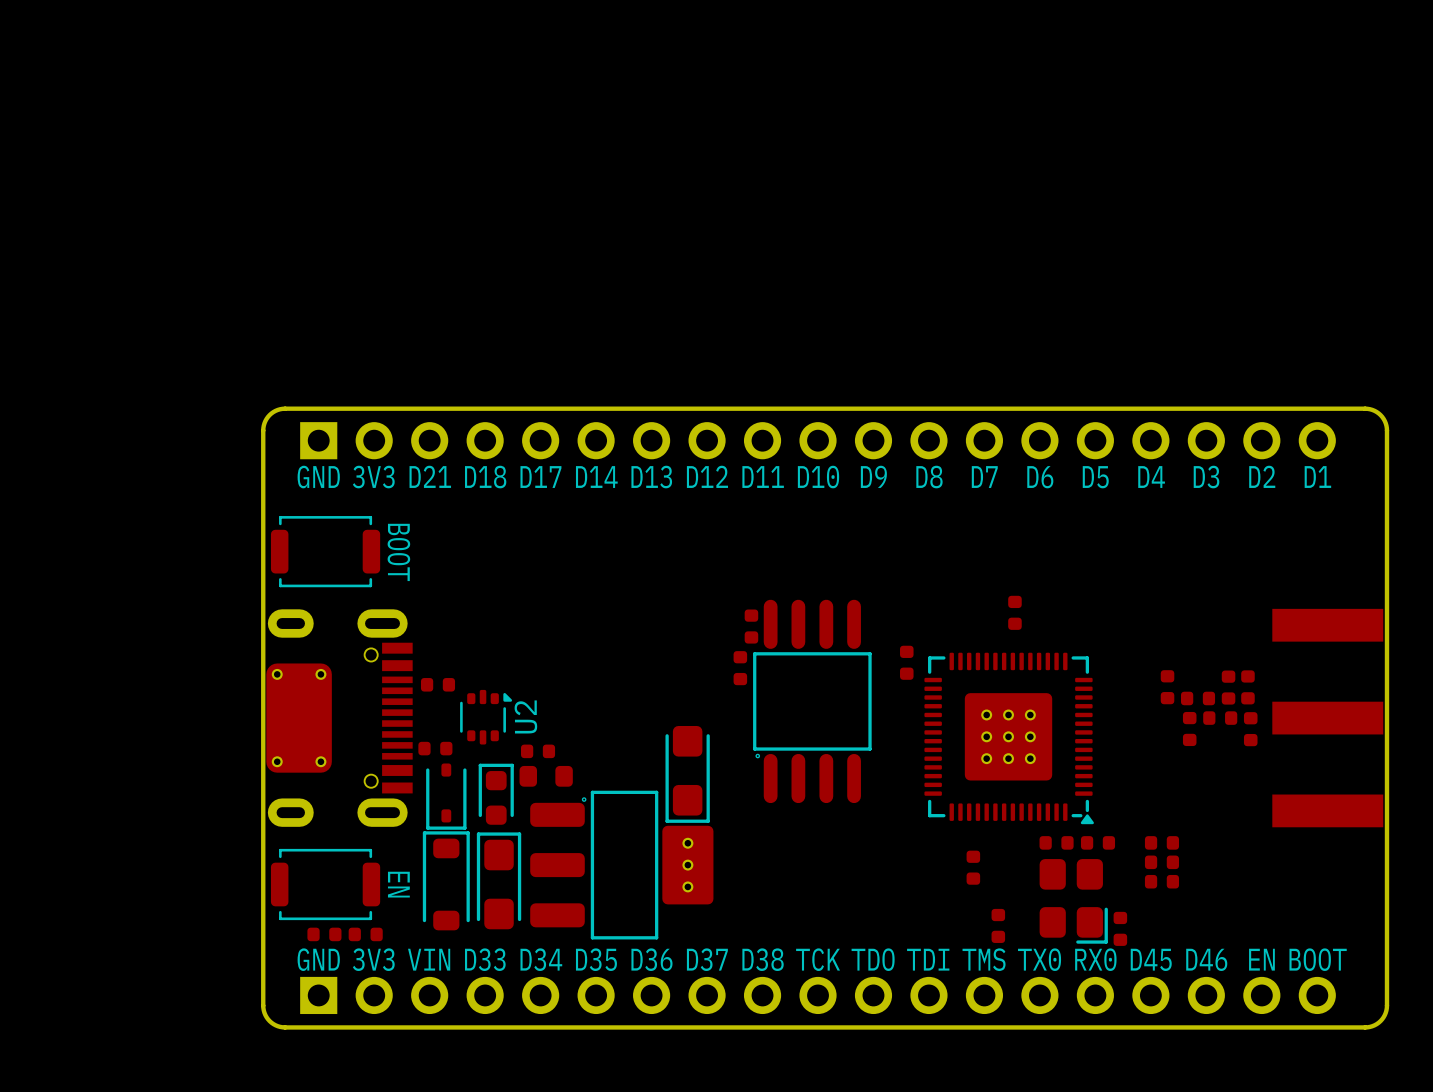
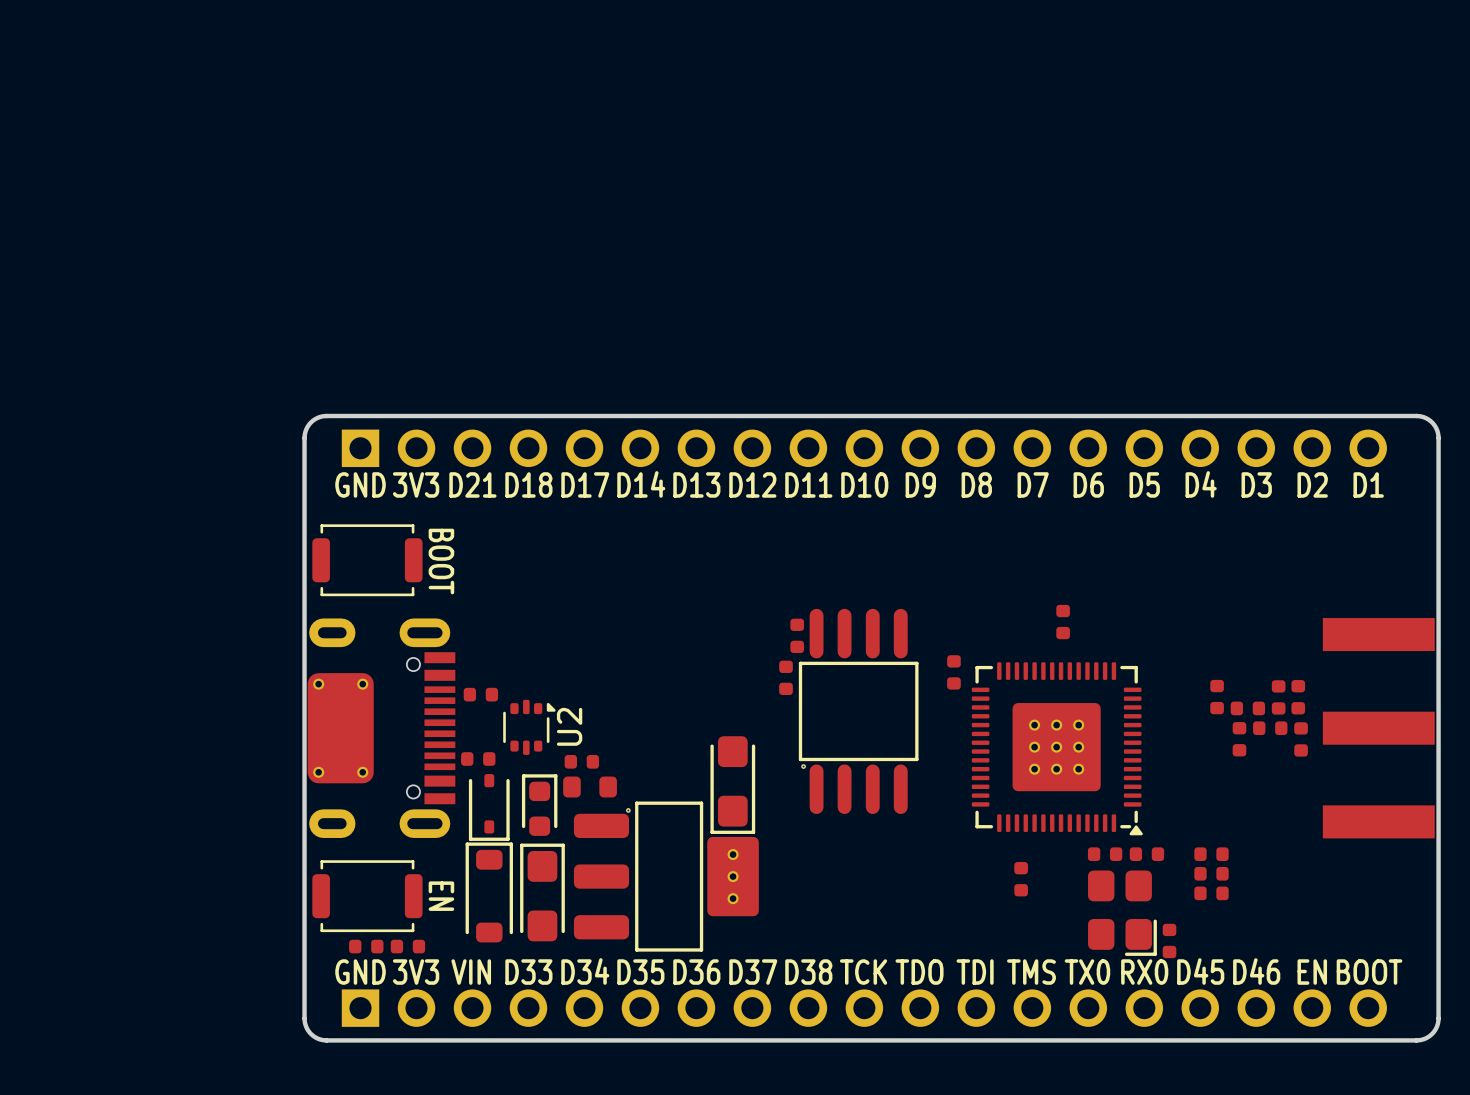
part: (998, 925) -> none

